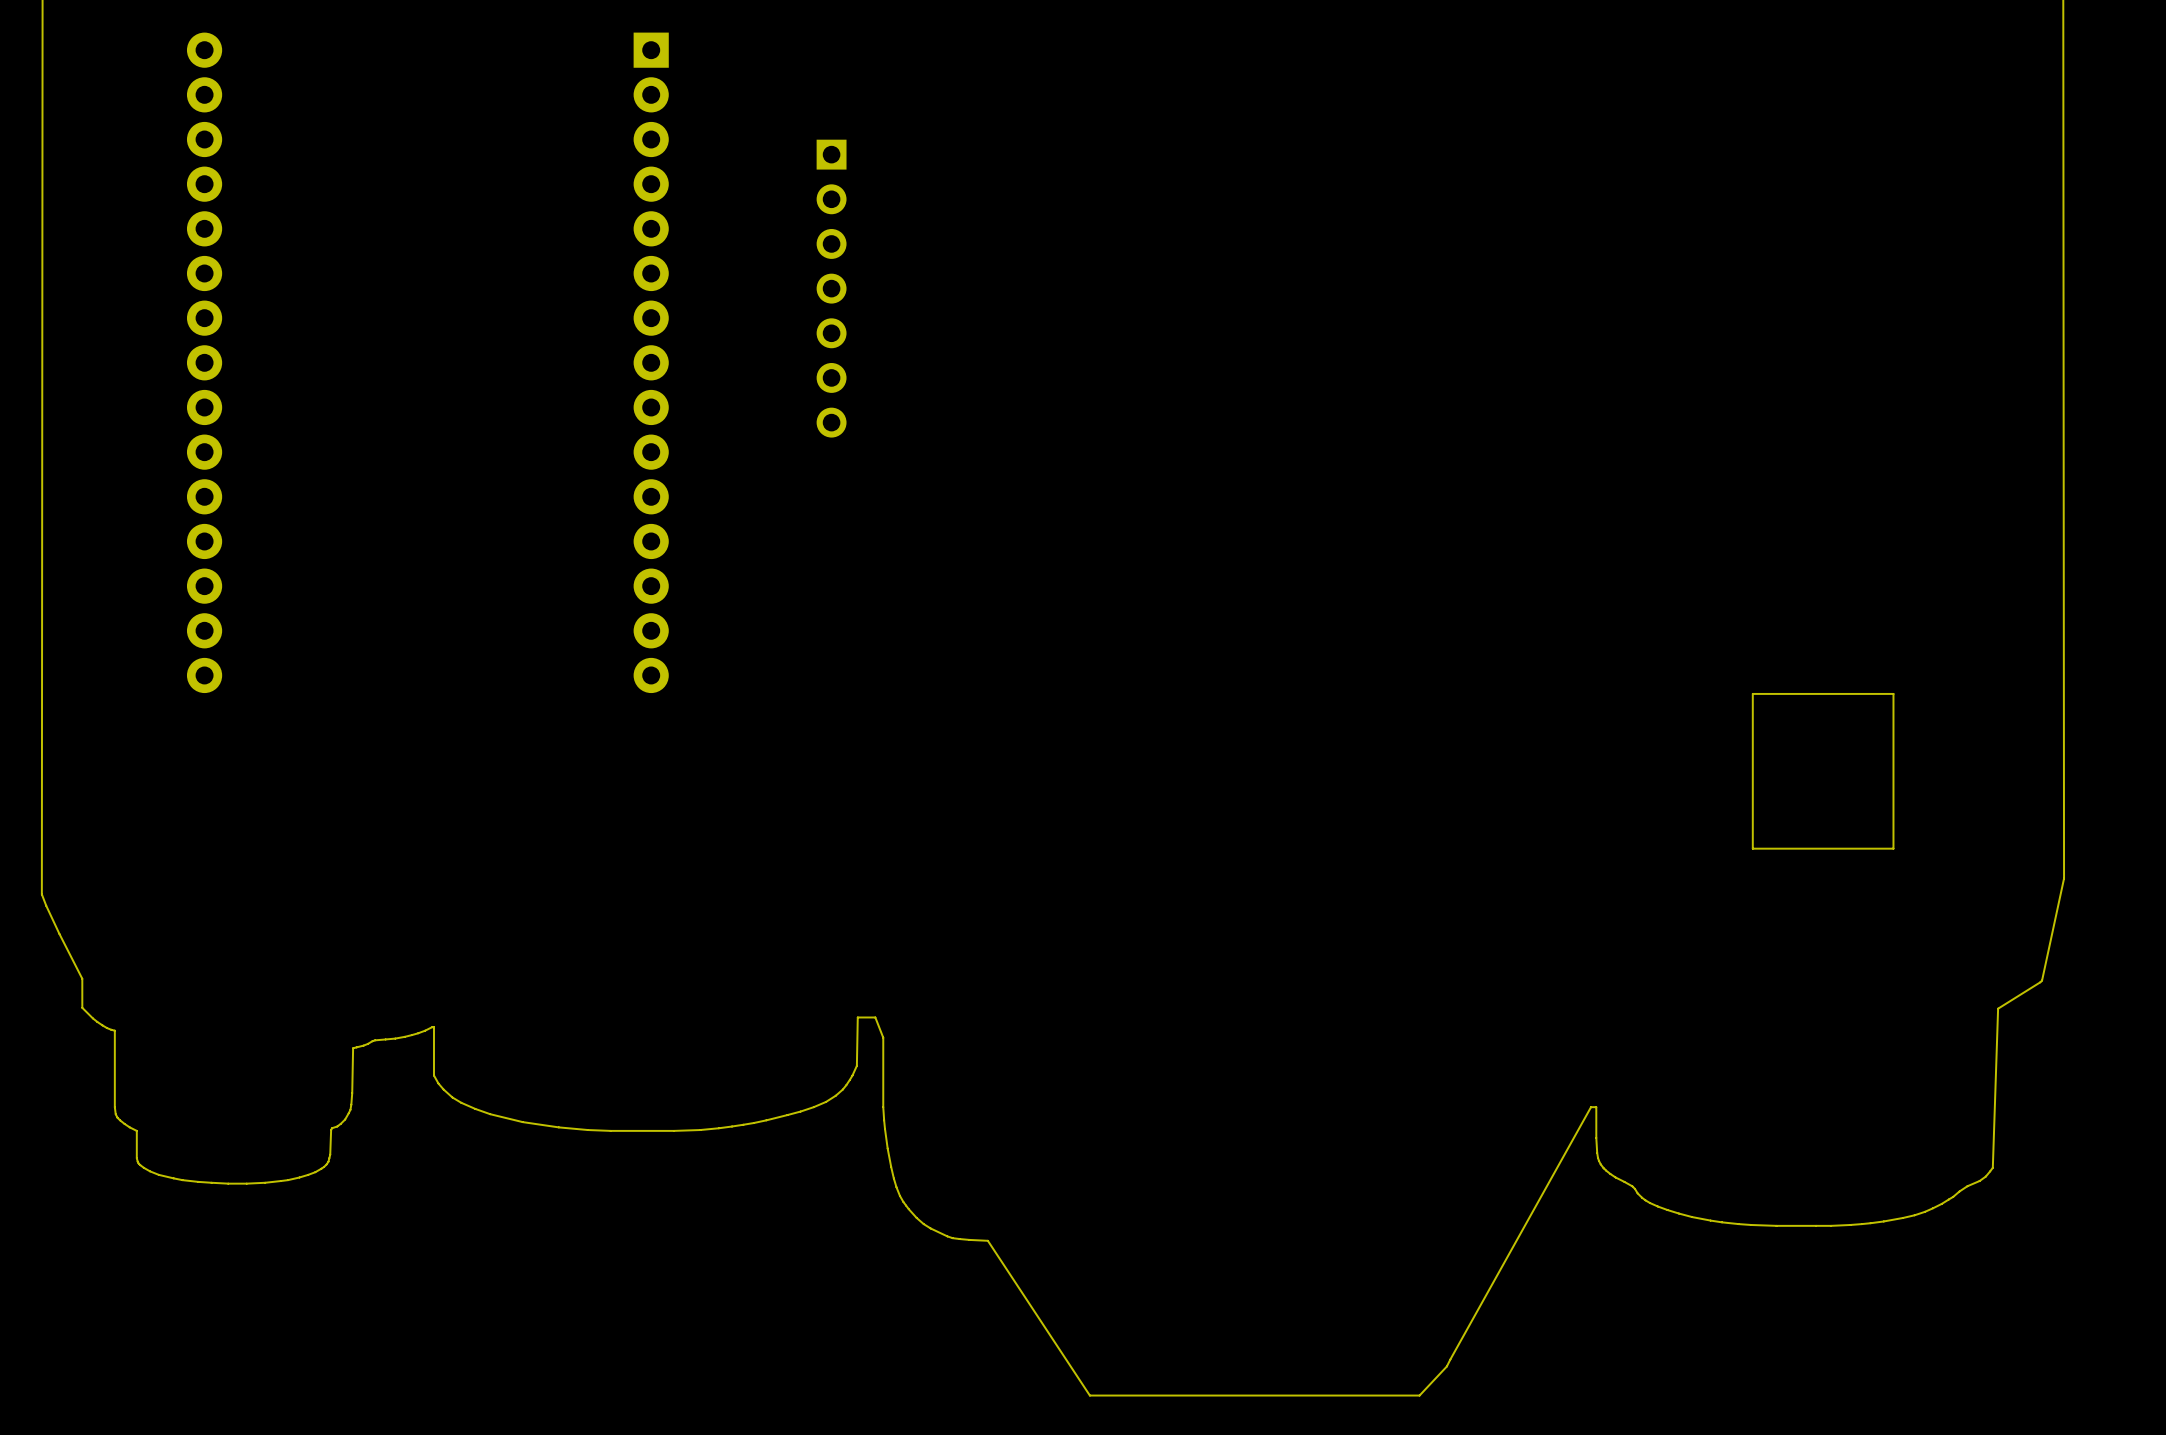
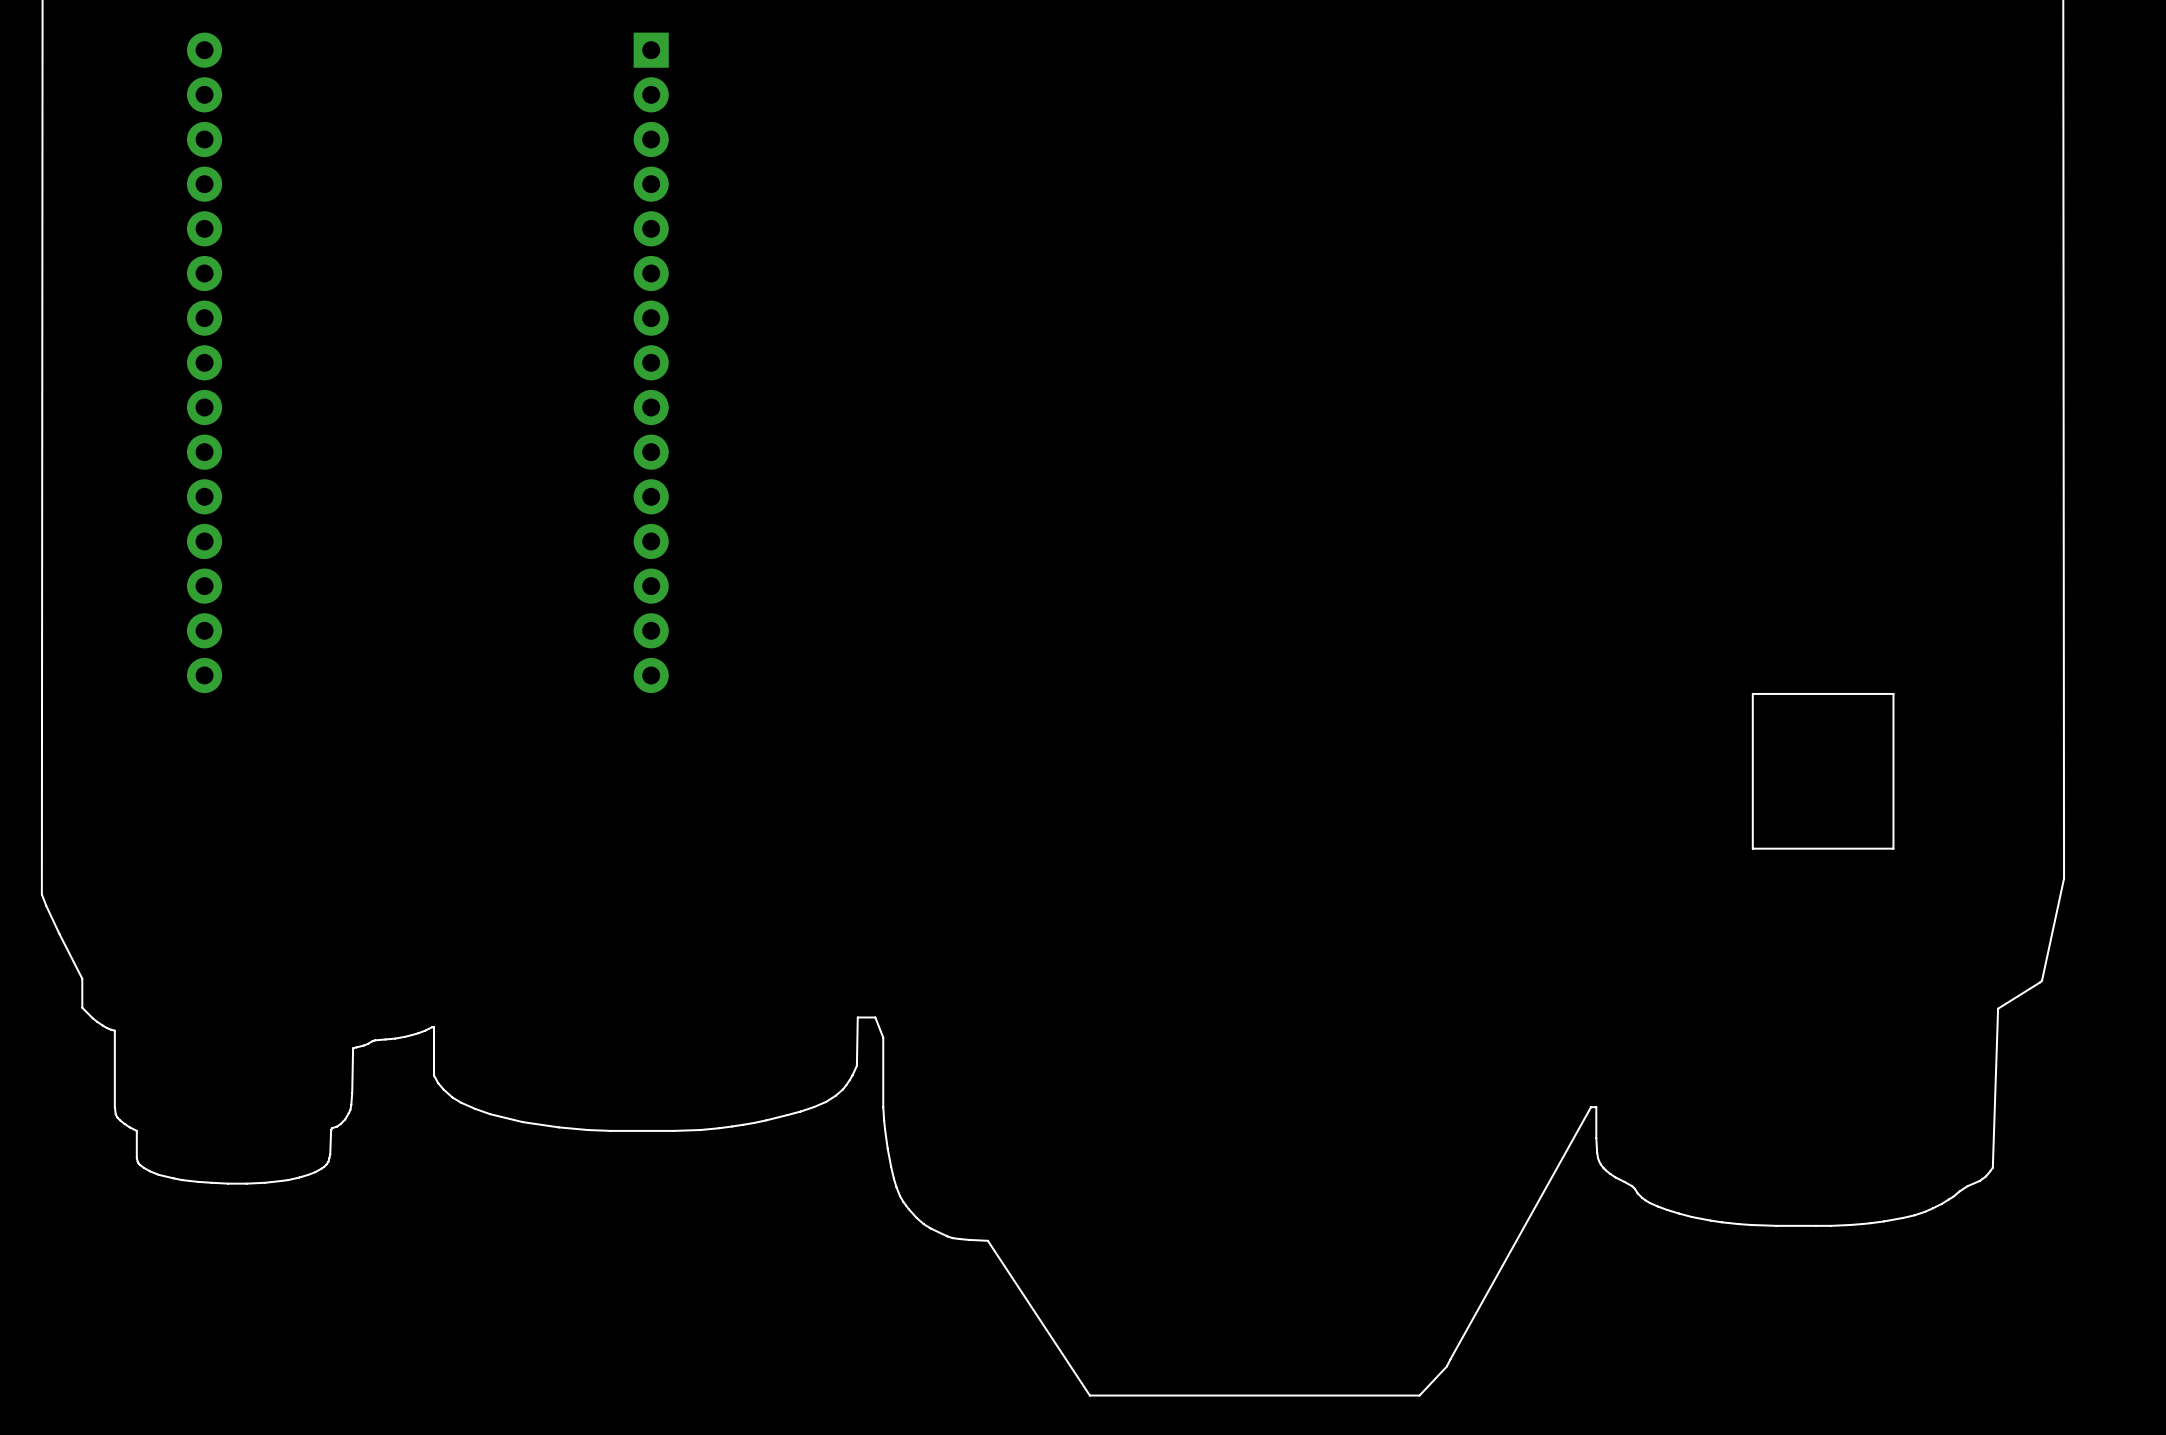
part: (831, 288) -> none

